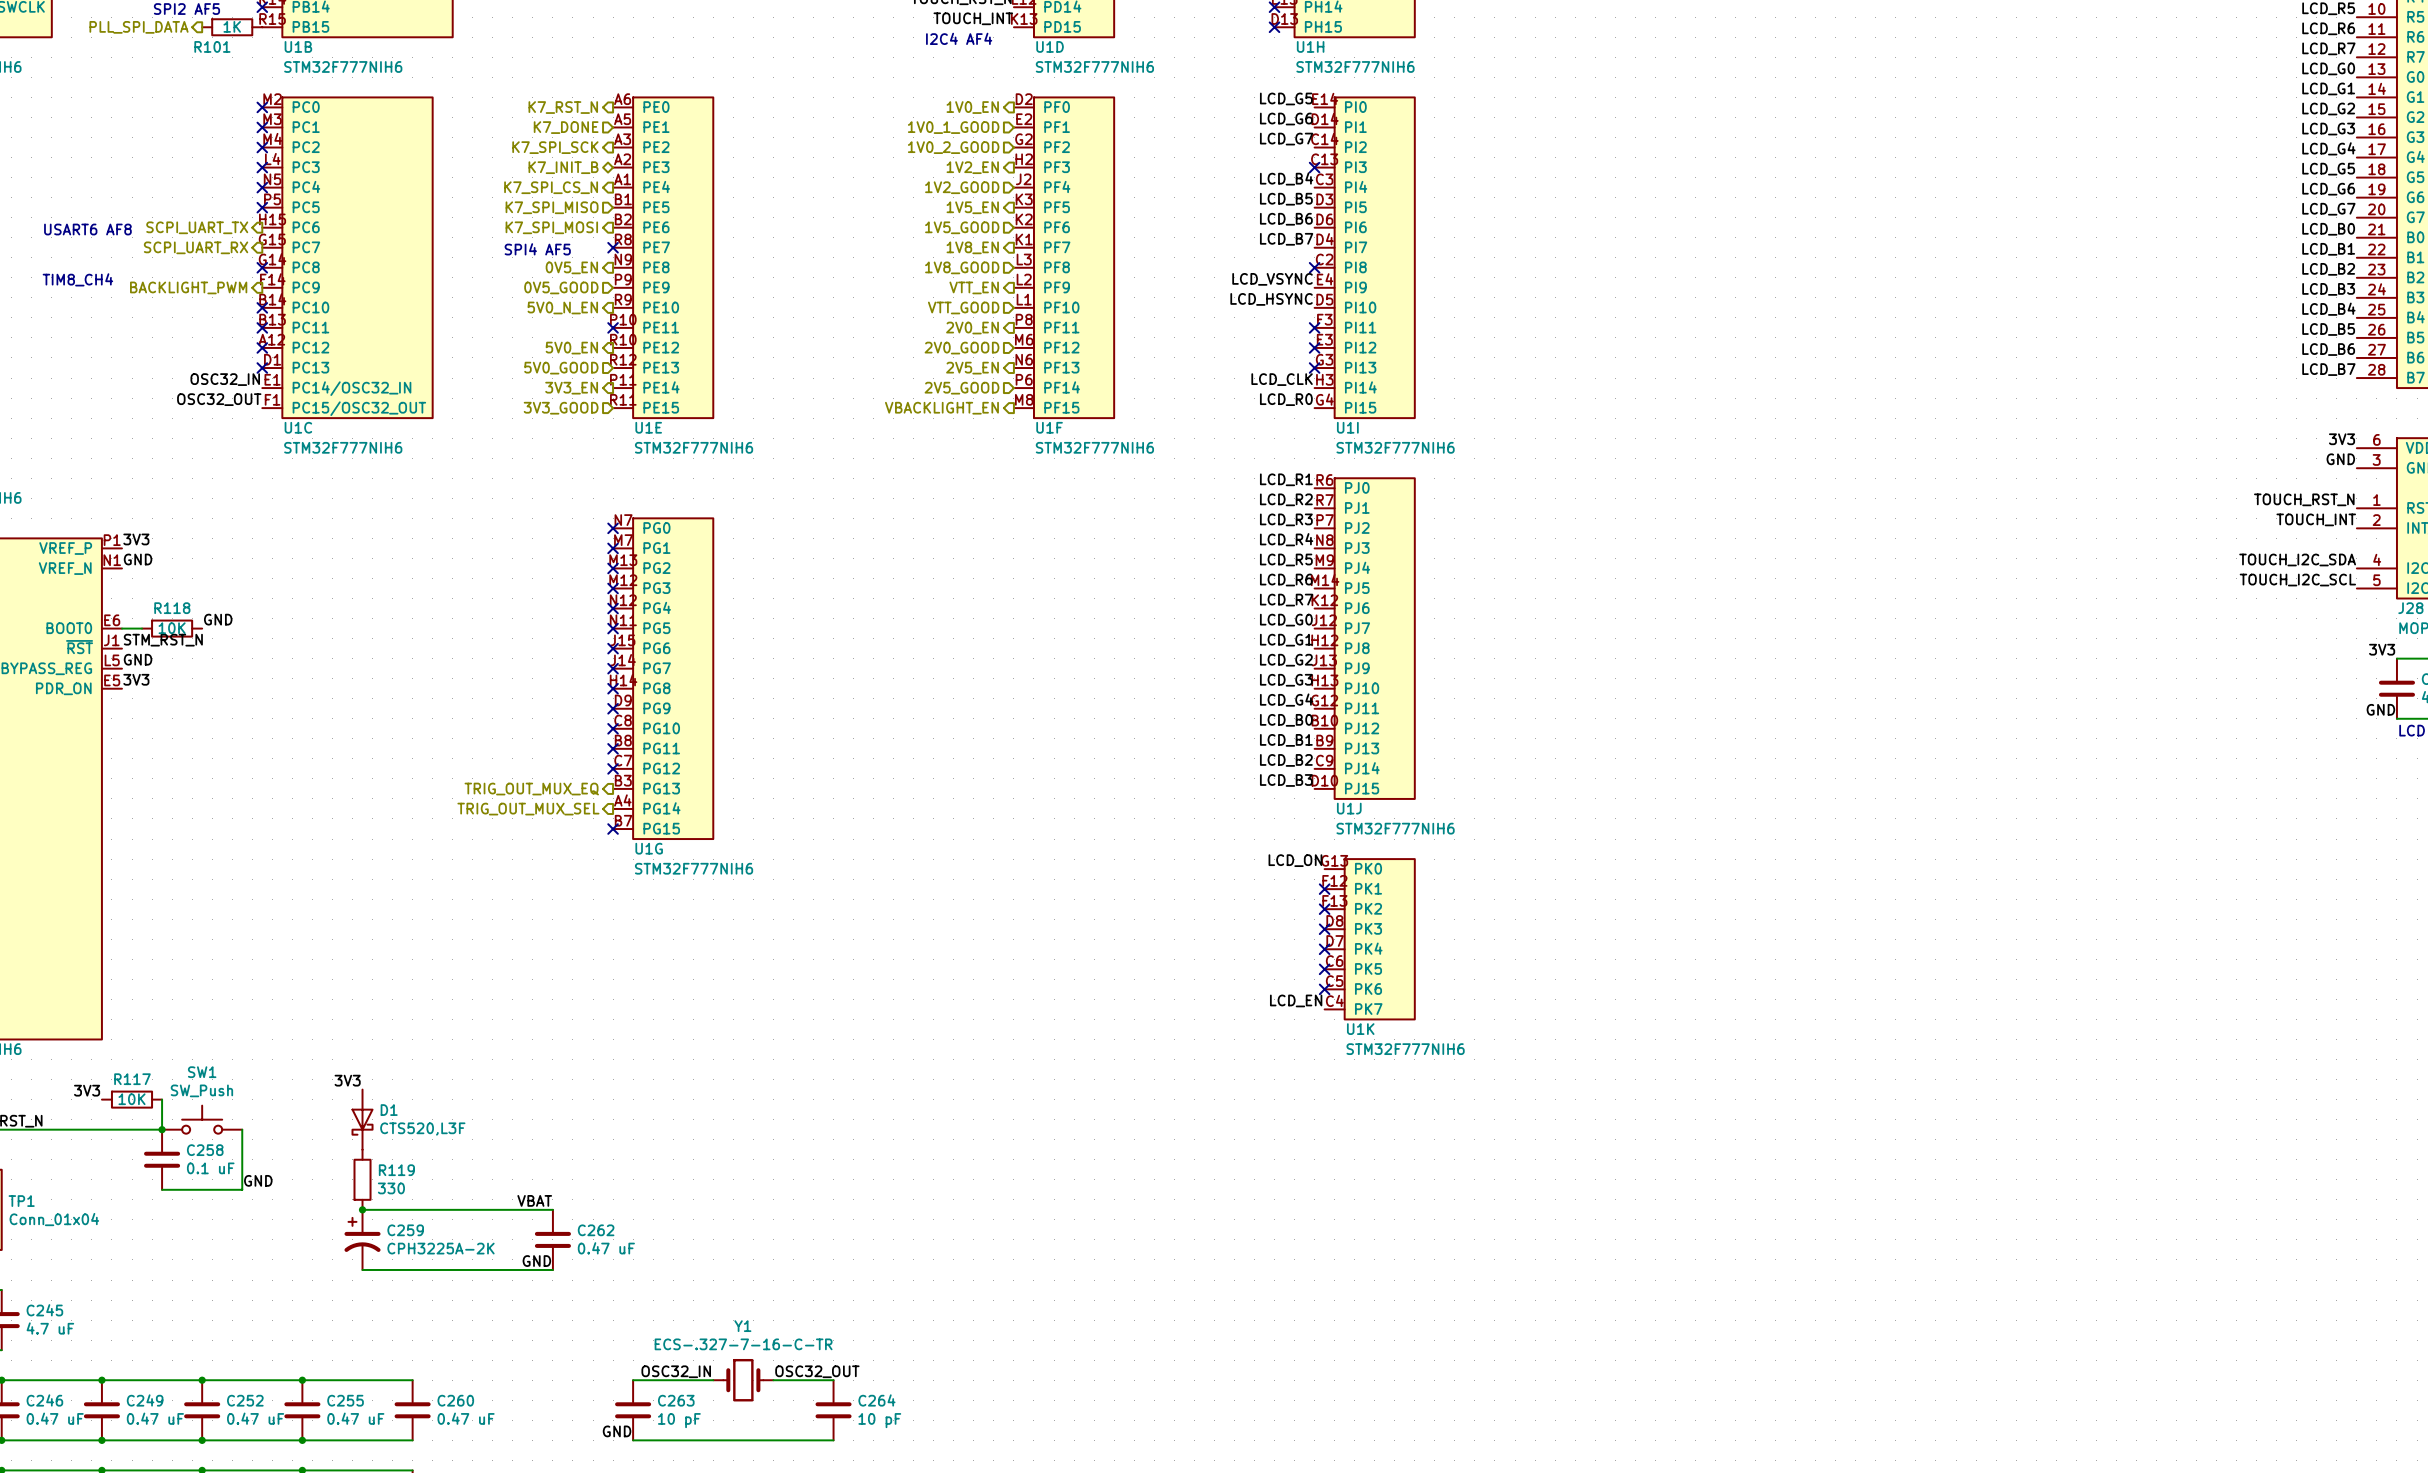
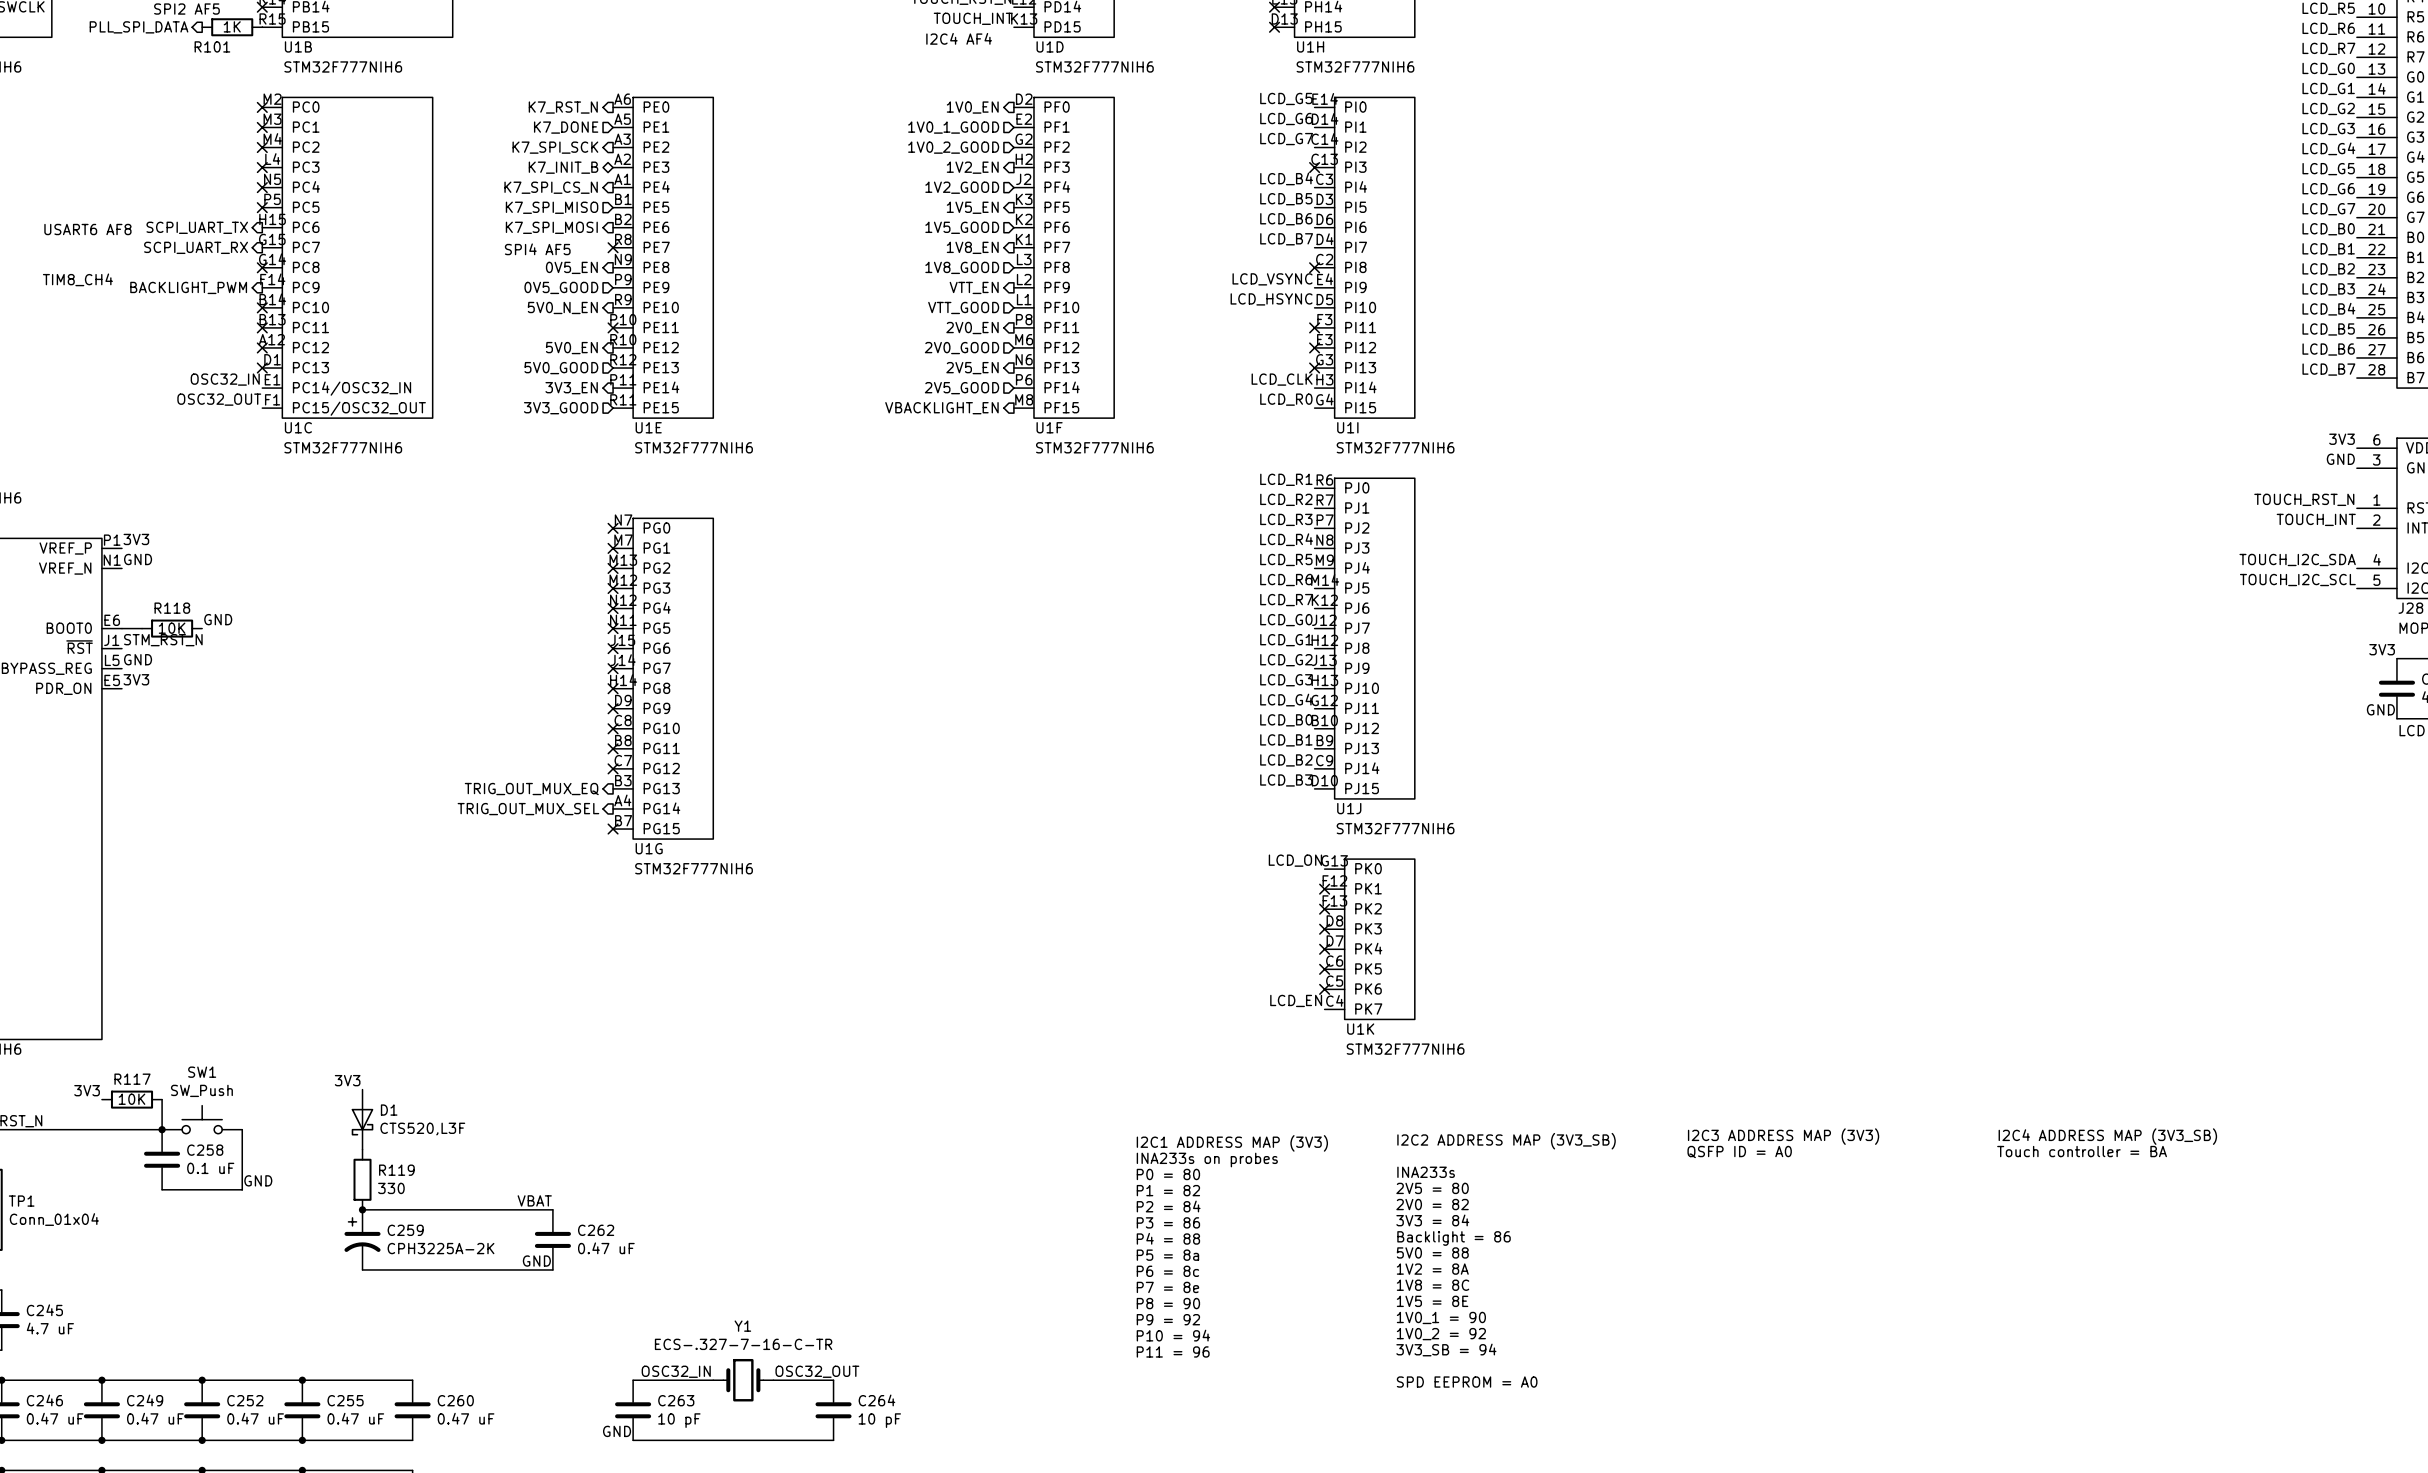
text: none -> I2C3 ADDRESS MAP (3V3) (1783, 1136)
text: none -> I2C4 ADDRESS MAP (3V3_SB) (2107, 1136)
text: none -> I2C2 ADDRESS MAP (3V3_SB) (1506, 1141)
text: none -> I2C1 ADDRESS MAP (3V3) (1232, 1143)
text: none -> Touch controller = BA (2082, 1151)
text: none -> QSFP ID = A0 (1739, 1152)
text: none -> INA233s on probes (1207, 1160)
text: none -> INA233s (1426, 1172)
text: none -> P0 = 80 (1168, 1174)
text: none -> 2V5 = 80 (1432, 1188)
text: none -> P1 = 82 (1168, 1190)
text: none -> 2V0 = 82 (1432, 1204)
text: none -> P2 = 84 (1168, 1206)
text: none -> 3V3 = 84 (1432, 1220)
text: none -> P3 = 86 (1168, 1222)
text: none -> P4 = 88 (1168, 1238)
text: none -> Backlight = 86 (1454, 1238)
text: none -> 5V0 = 88 (1432, 1252)
text: none -> P5 = 8a (1167, 1255)
text: none -> 1V2 = 8A (1432, 1269)
text: none -> P6 = 8c (1167, 1271)
text: none -> 1V8 = 8C (1433, 1285)
text: none -> P7 = 8e (1167, 1287)
text: none -> 1V5 = 8E (1432, 1301)
text: none -> P8 = 90 (1168, 1303)
text: none -> 1V0_1 = 90 (1441, 1317)
text: none -> P9 = 92 (1168, 1319)
text: none -> 1V0_2 = 92 (1441, 1334)
text: none -> P10 = 94 (1173, 1335)
text: none -> 3V3_SB = 94 (1446, 1350)
text: none -> P11 = 96 (1173, 1351)
text: none -> SPD EEPROM = A0 (1467, 1382)

